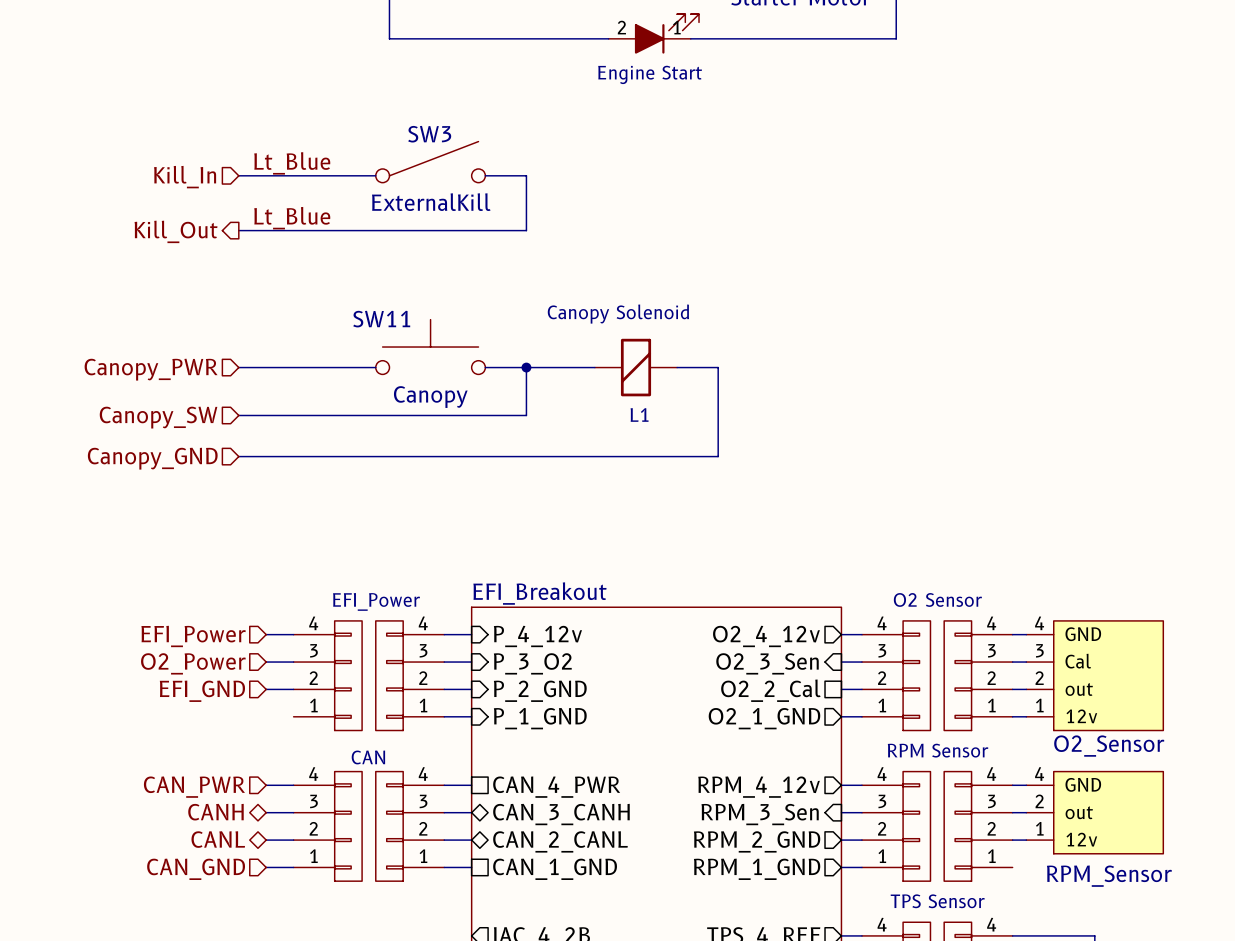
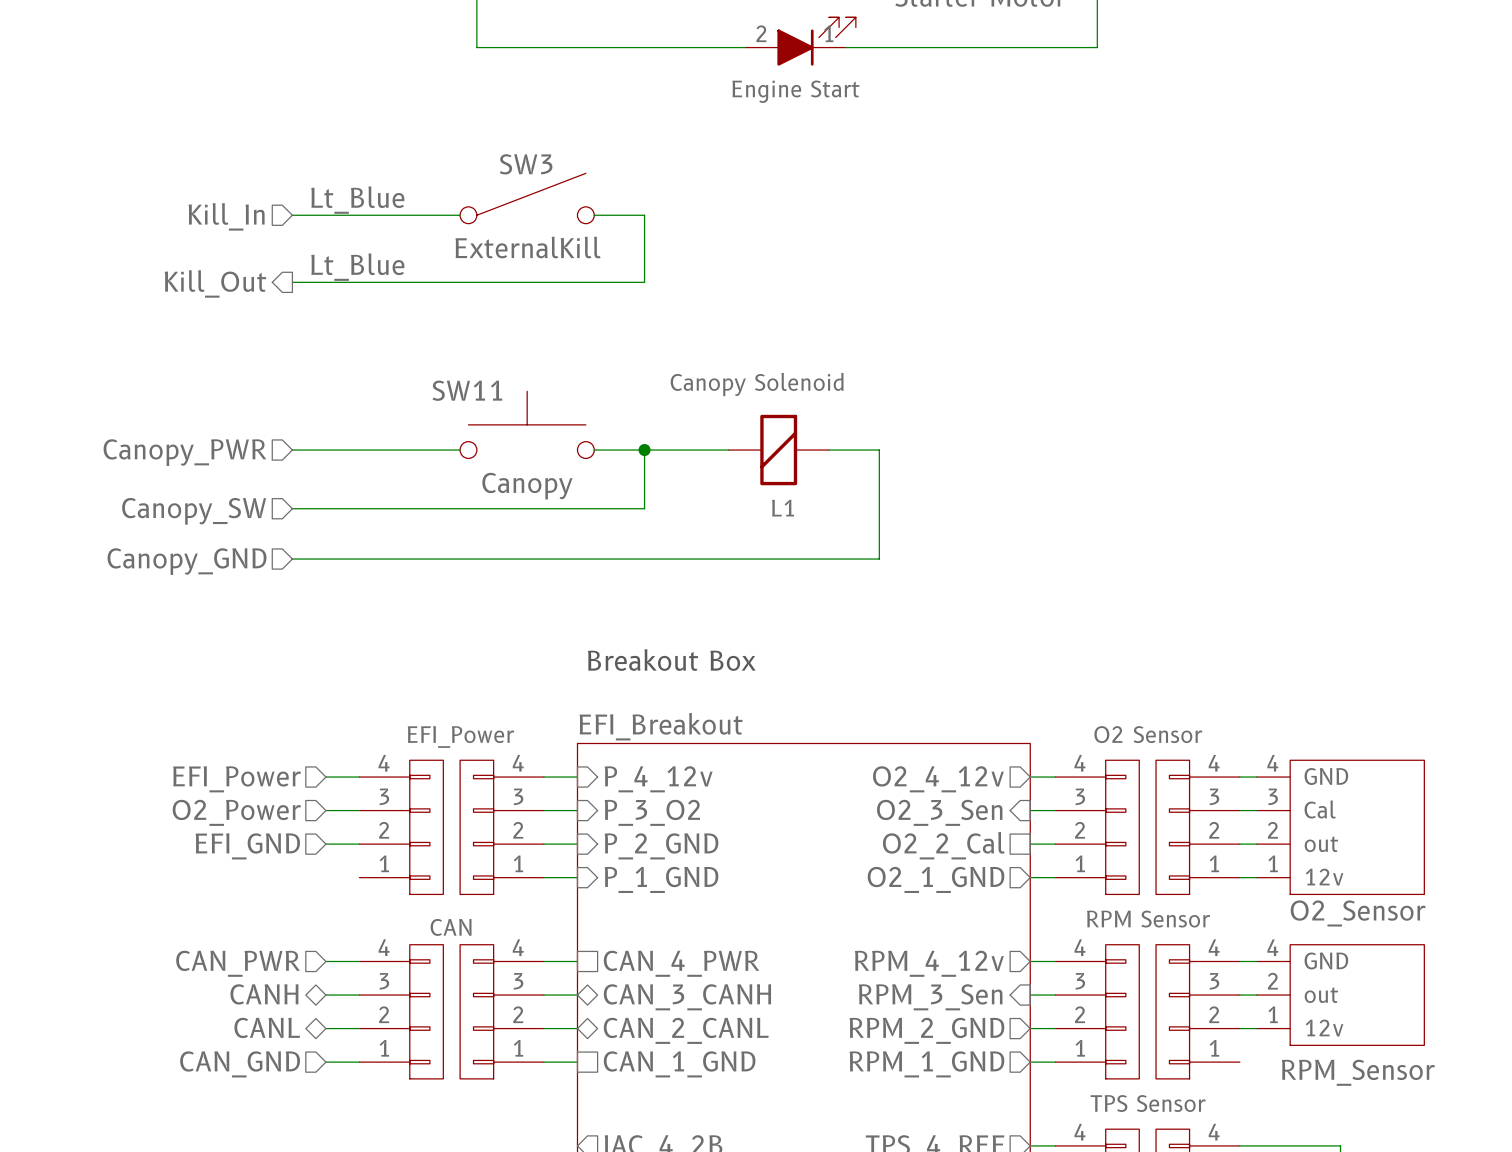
text: none -> Breakout Box (671, 660)

